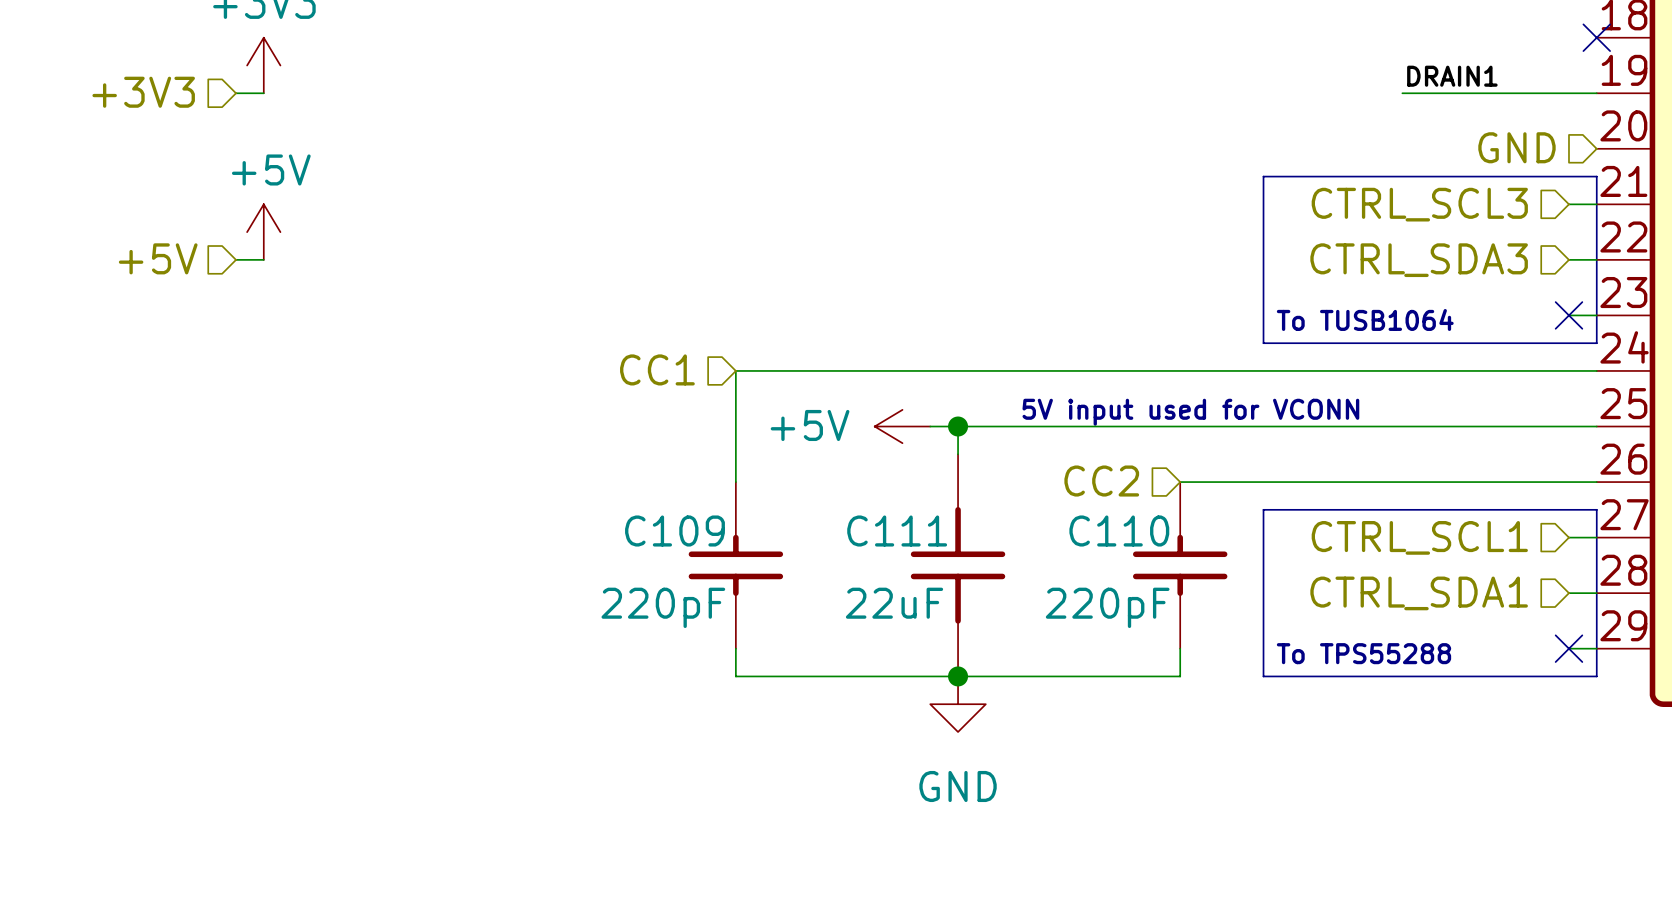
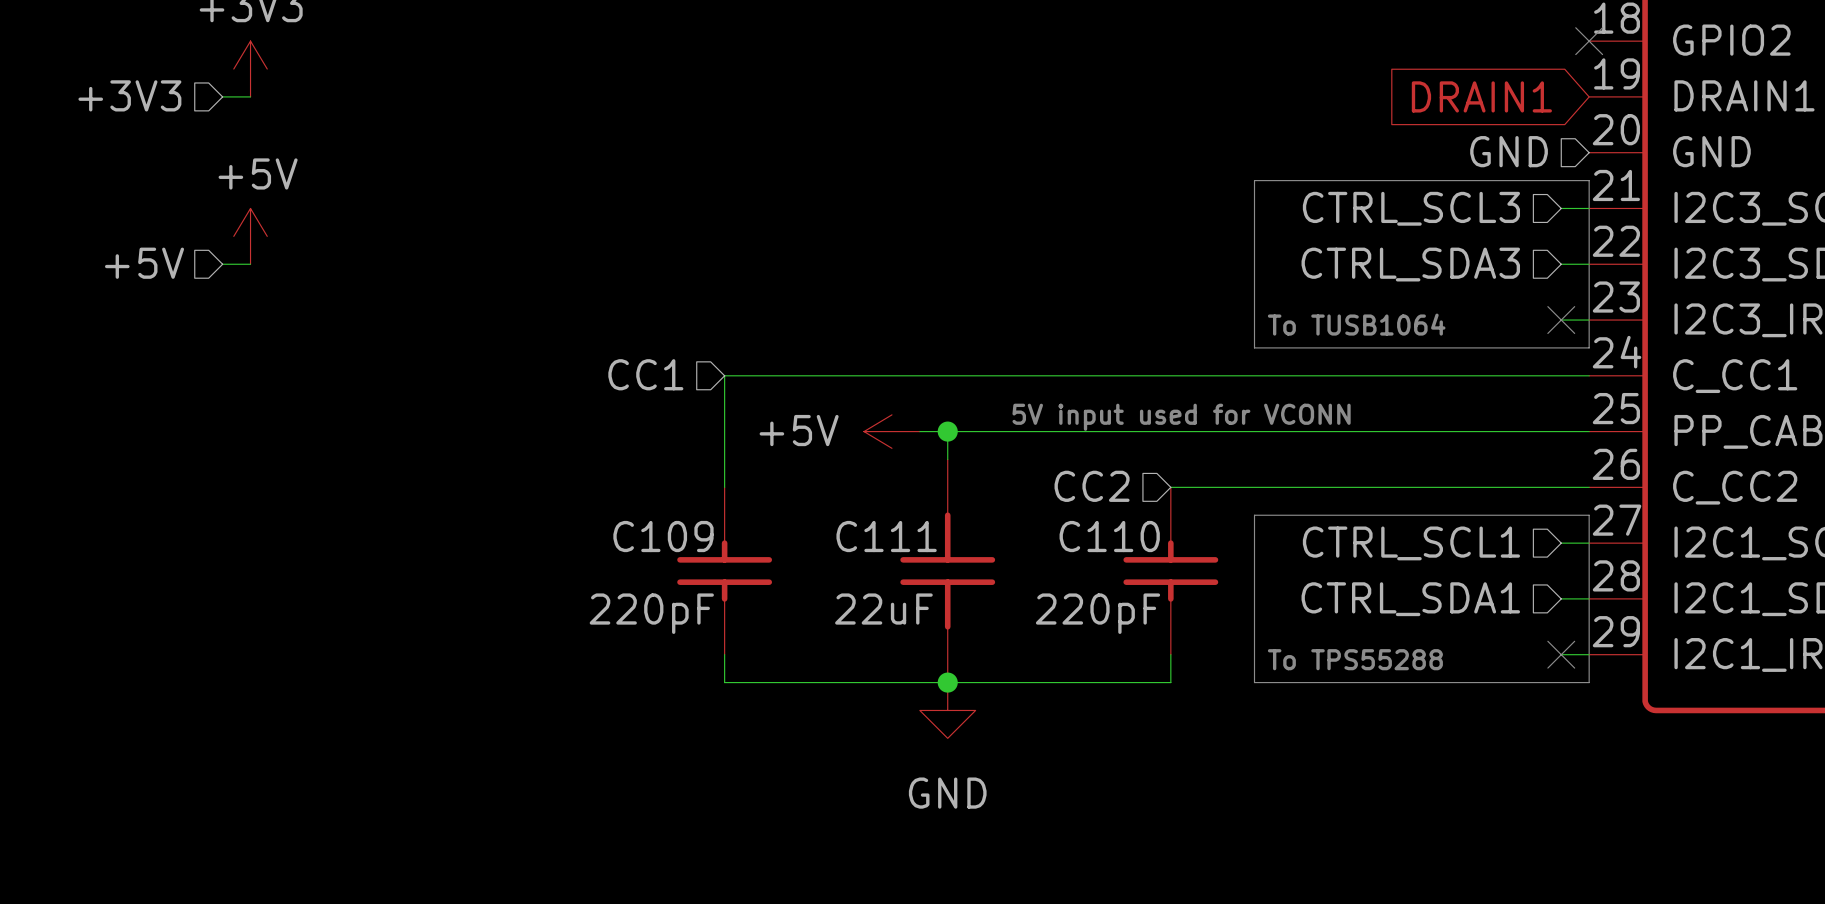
label: DRAIN1 (1452, 76) -> none
wire: (1402, 93) (1596, 93) -> none
global label: none -> DRAIN1 (1481, 96)

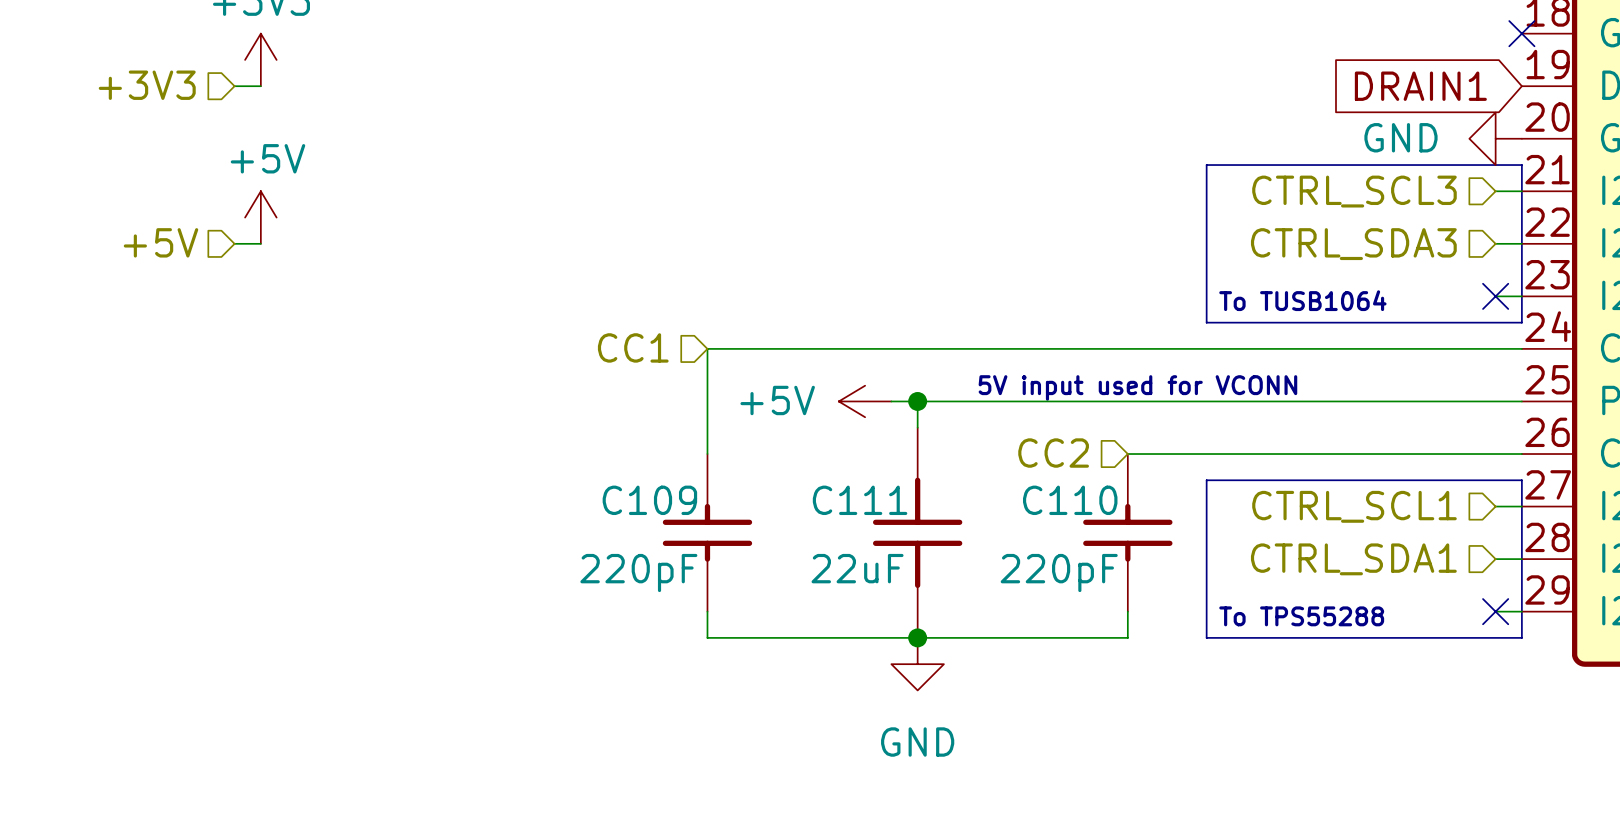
hierarchical label: GND (1509, 151) -> none
power symbol: none -> GND (1495, 138)

